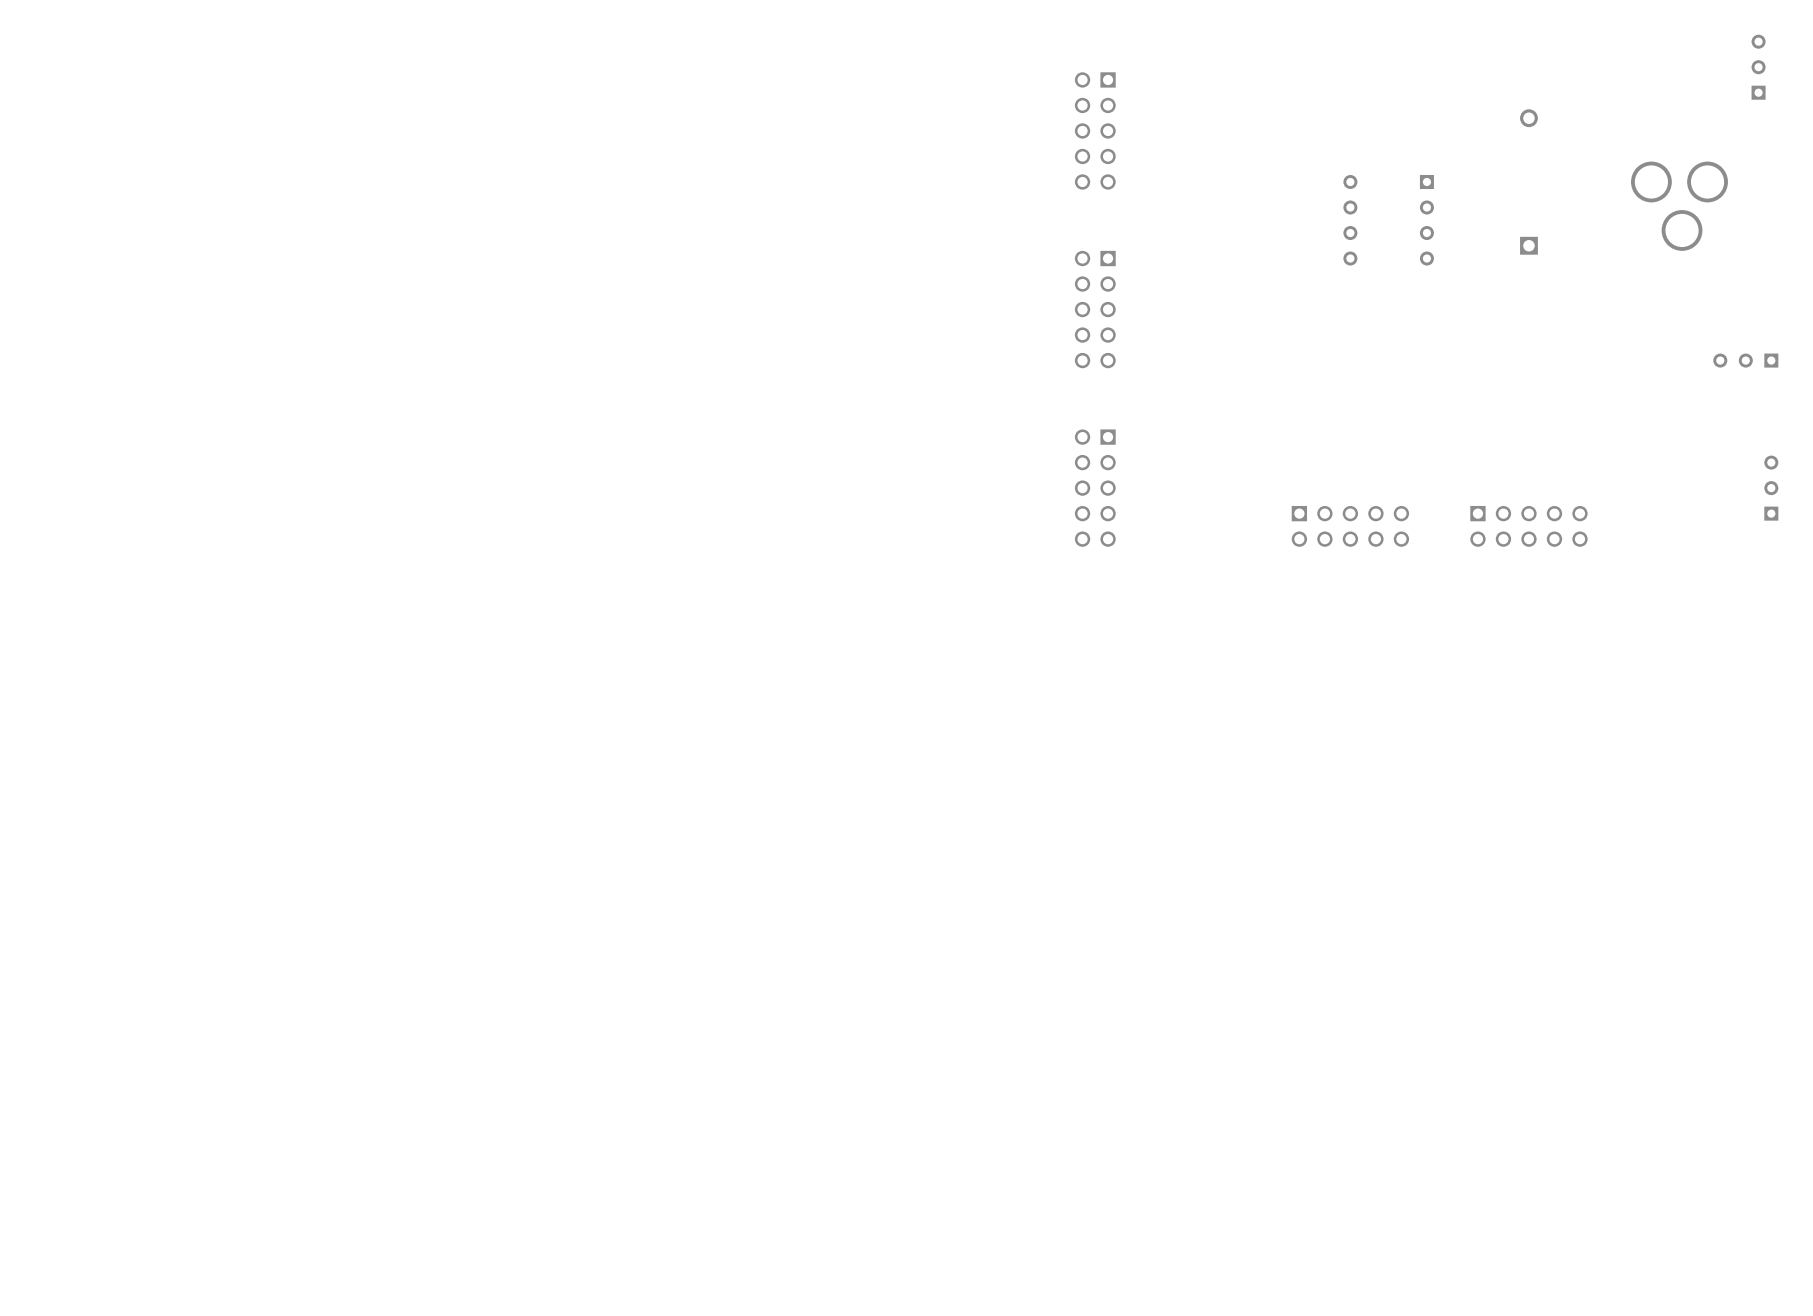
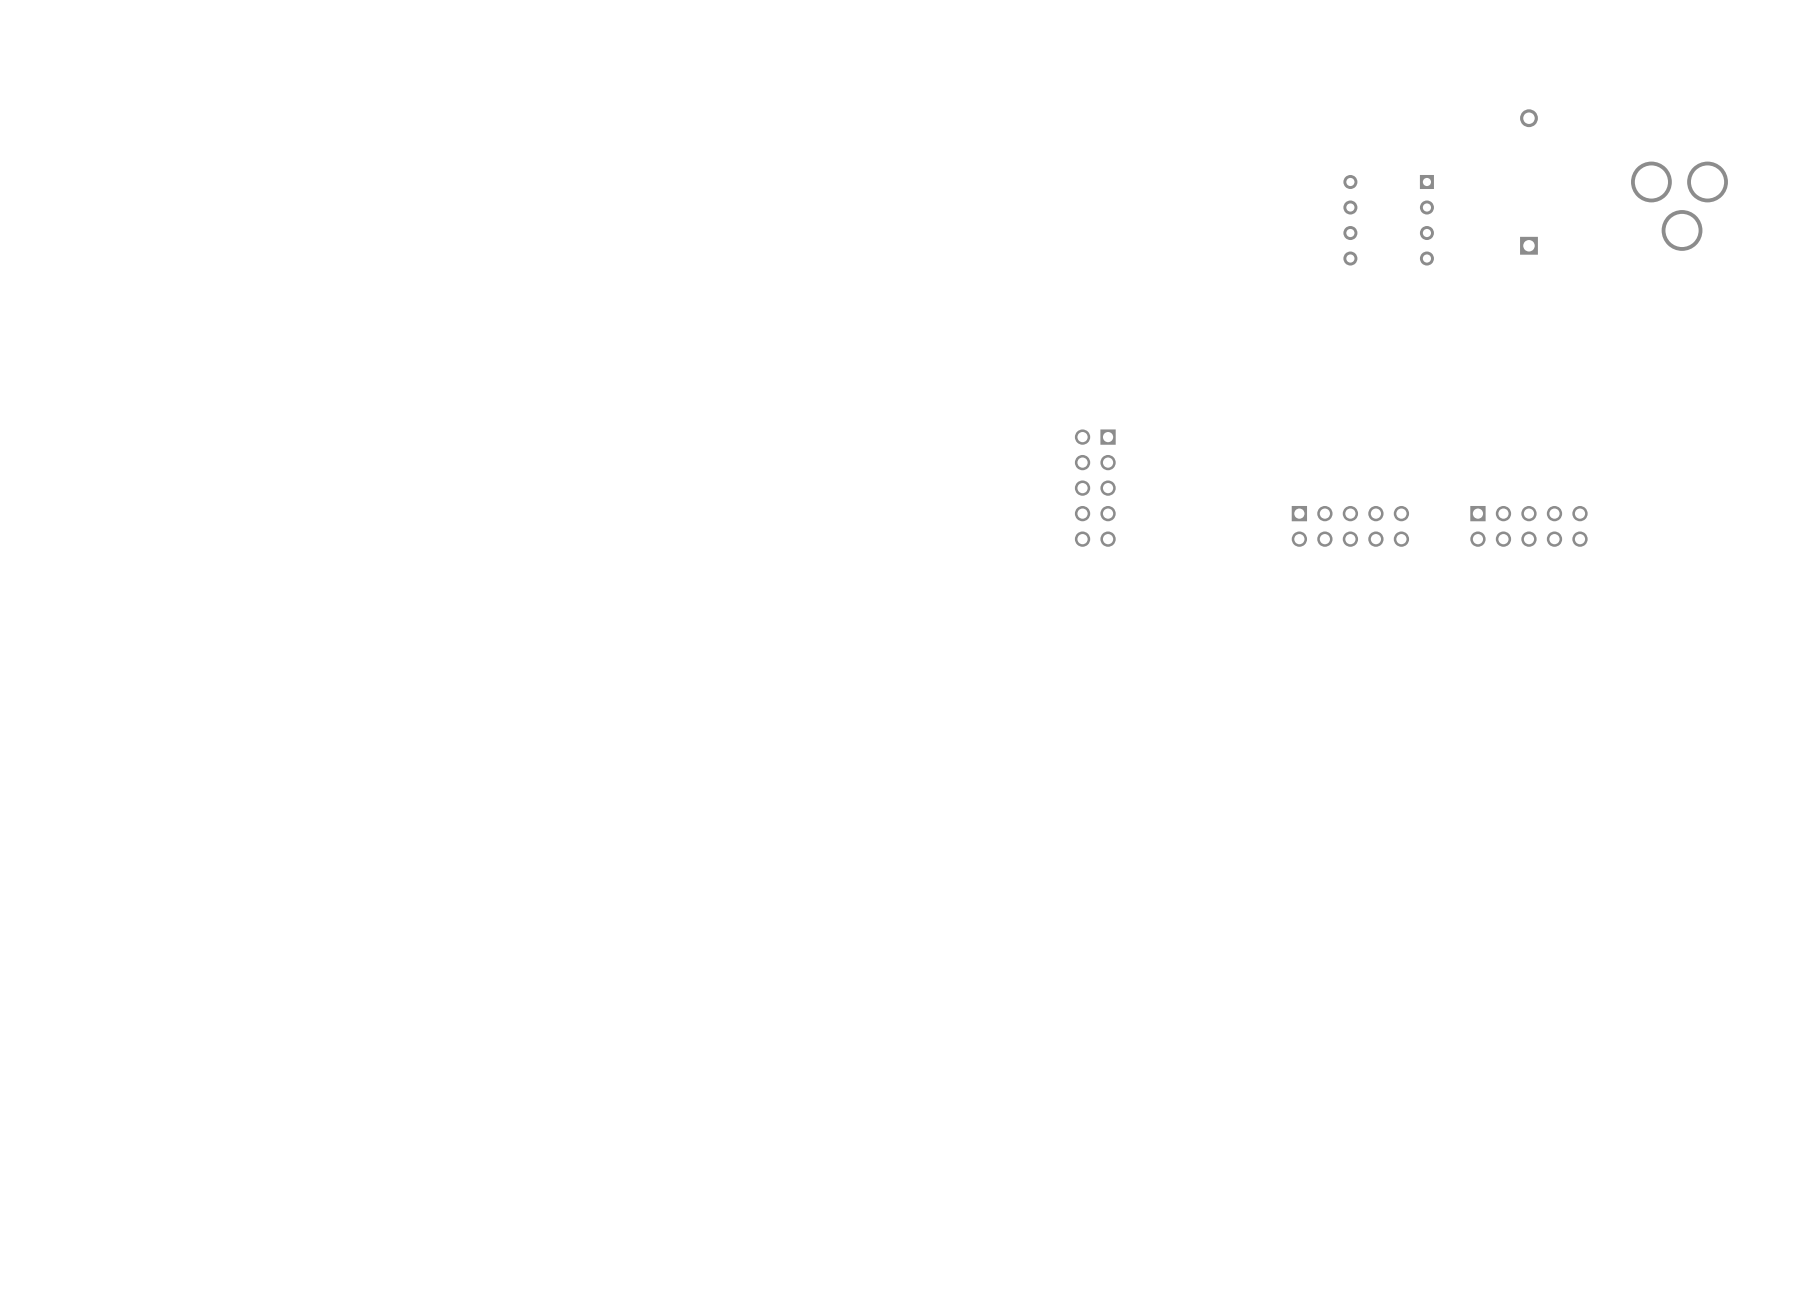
part: (1758, 67) -> none
part: (1095, 130) -> none
part: (1095, 309) -> none
part: (1745, 360) -> none
part: (1771, 488) -> none

